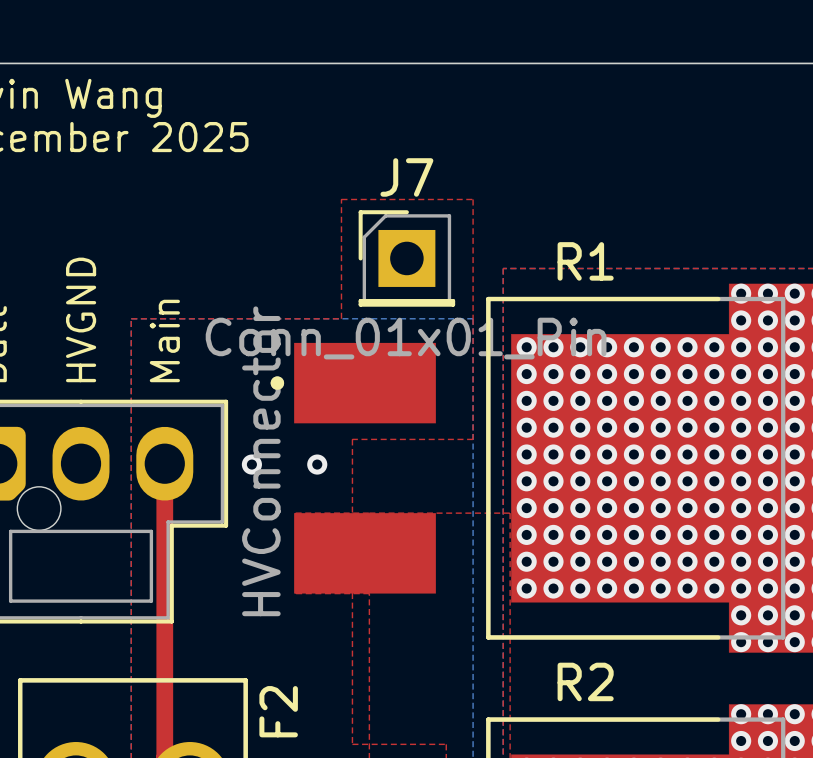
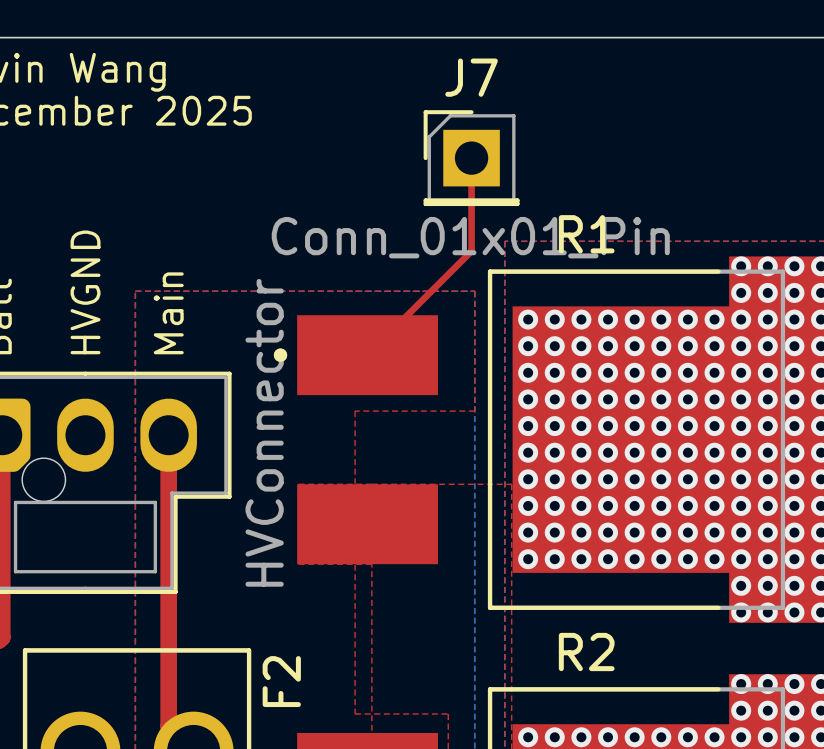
top track: none -> (471, 158) (471, 251) (367, 355)
J7 position: (406, 258) -> (471, 158)
top zone outline: (341, 318) (341, 199) (473, 199) (473, 318) -> (344, 291) (474, 291)
via: (251, 464) -> none
via: (317, 464) -> none

